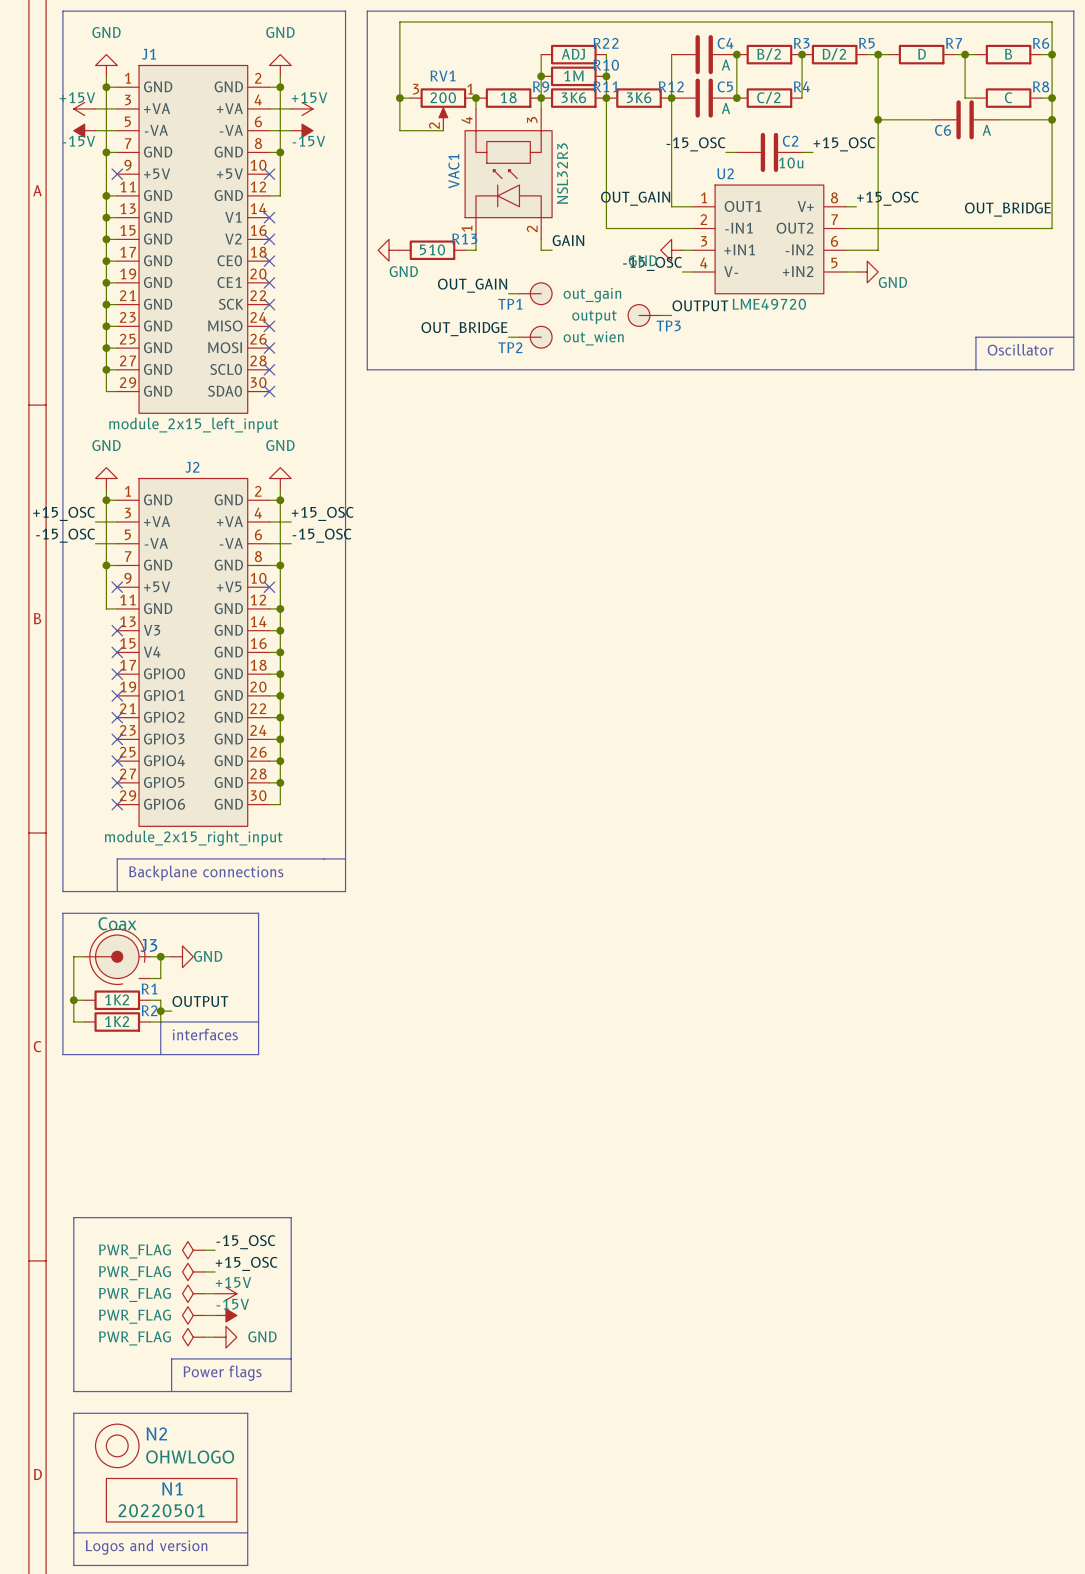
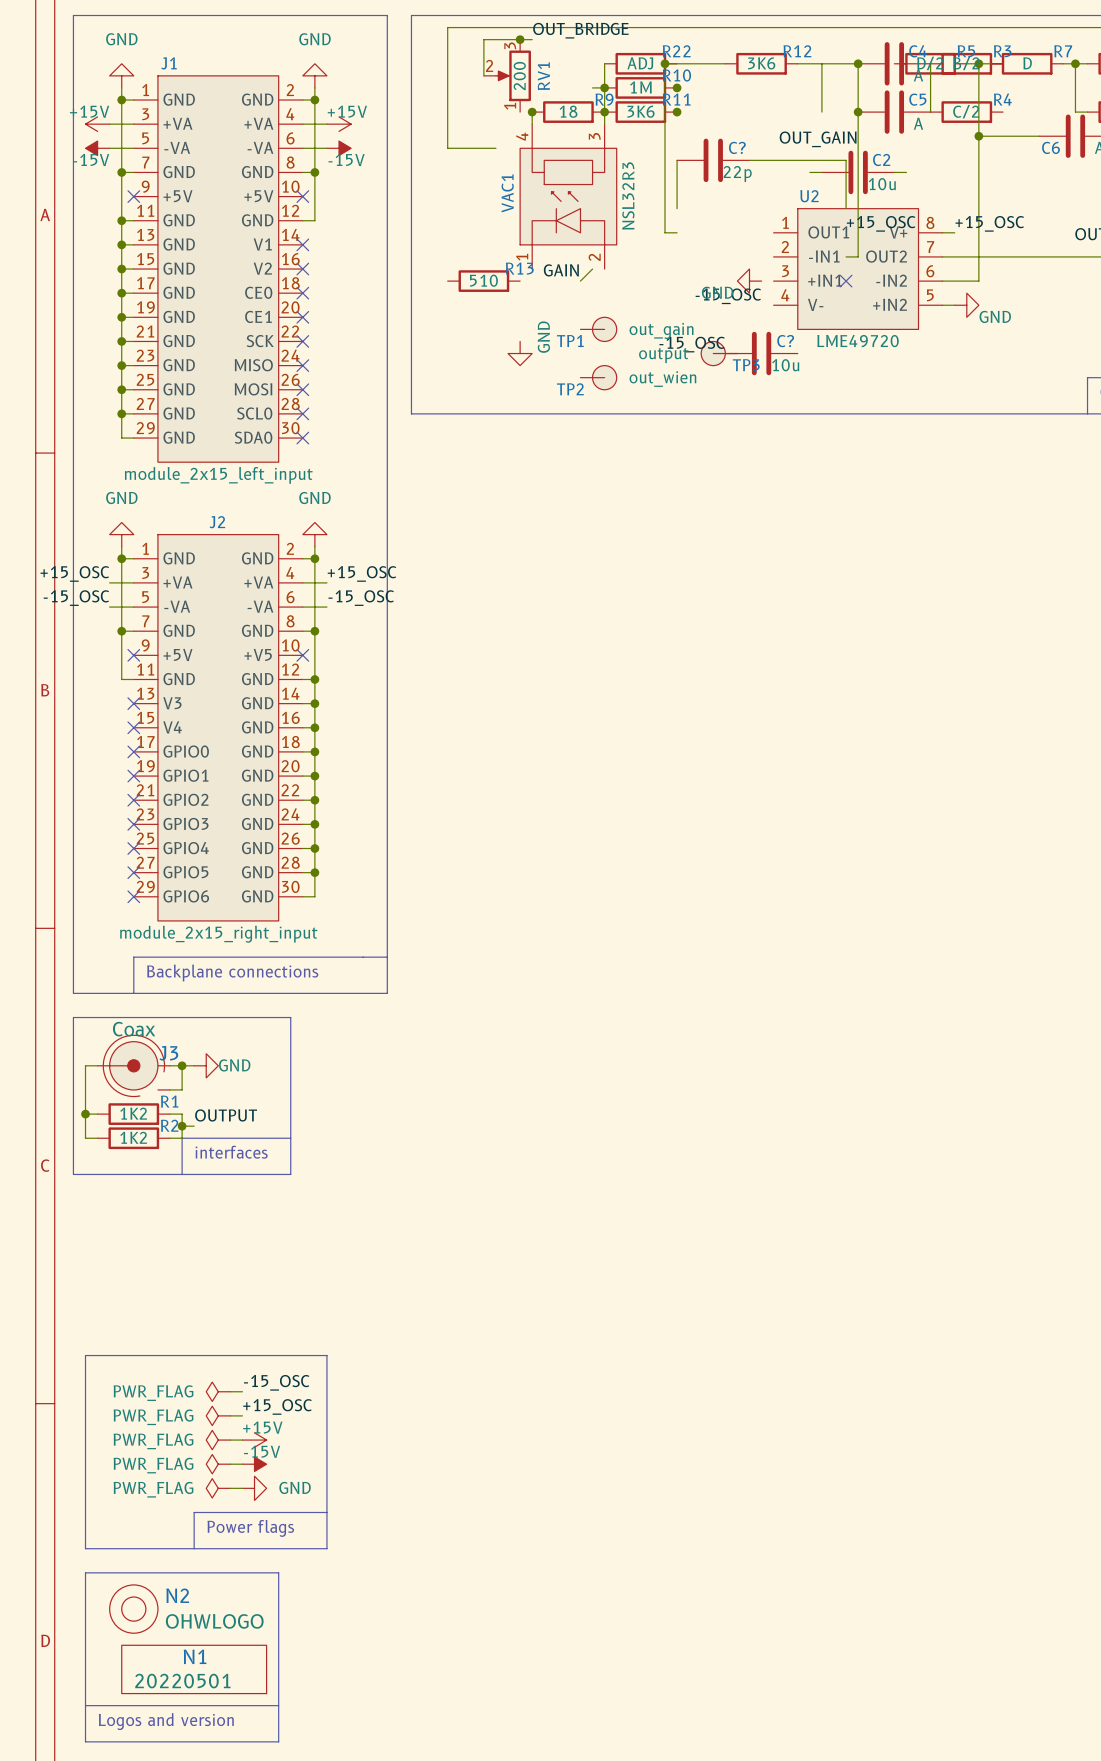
label: none -> OUT_BRIDGE (580, 30)
junction: none -> (520, 39)
wire: none -> (532, 39) (483, 39) (483, 75)
junction: none -> (664, 63)
wire: (606, 54) (606, 141) -> none
wire: none -> (725, 63) (664, 63) (664, 232) (677, 232)
wire: (671, 54) (671, 206) (693, 206) -> none
C4 position: (704, 54) -> (894, 63)
wire: none -> (797, 63) (858, 63) (858, 256) (846, 256)
junction: (736, 54) -> none
junction: none -> (858, 63)
R3 position: (769, 54) -> (966, 63)
wire: (802, 54) (802, 98) -> (930, 63) (930, 112)
junction: (802, 54) -> none
wire: (399, 98) (410, 98) -> (592, 87) (604, 87)
junction: (399, 98) -> none
R12 position: (639, 98) -> (761, 63)
junction: (671, 98) -> none
C5 position: (704, 98) -> (894, 112)
junction: (736, 98) -> none
junction: none -> (858, 112)
R4 position: (769, 98) -> (966, 112)
RV1 rotation: 0° (443, 104) -> 90° clockwise (513, 75)
RV1 position: (443, 109) -> (507, 75)
C?: none -> 22p (713, 160)
wire: none -> (749, 160) (846, 160) (846, 208)
label position: -15_OSC (696, 144) -> -15_OSC (692, 344)
label position: +15_OSC (844, 144) -> +15_OSC (881, 223)
wire: (606, 185) (606, 228) (693, 228) -> none
label position: OUT_GAIN (635, 198) -> OUT_GAIN (818, 139)
wire: (475, 239) (475, 250) (465, 250) -> none
wire: none -> (592, 269) (580, 281)
wire: (541, 239) (541, 250) (552, 250) -> none
label position: GAIN (568, 240) -> GAIN (561, 270)
power symbol rotation: 0° (389, 250) -> 90° counterclockwise (520, 353)
power symbol position: GND (389, 250) -> GND (520, 353)
wire: (682, 250) (693, 250) -> none
no-connect mark: none -> (846, 281)
wire: (682, 272) (693, 272) -> none
label: OUT_GAIN (472, 285) -> none
wire: (508, 293) (519, 293) -> none
label: OUTPUT (700, 305) -> none
C?: none -> 10u (761, 353)
label: OUT_BRIDGE (464, 329) -> none
wire: (508, 337) (519, 337) -> none

